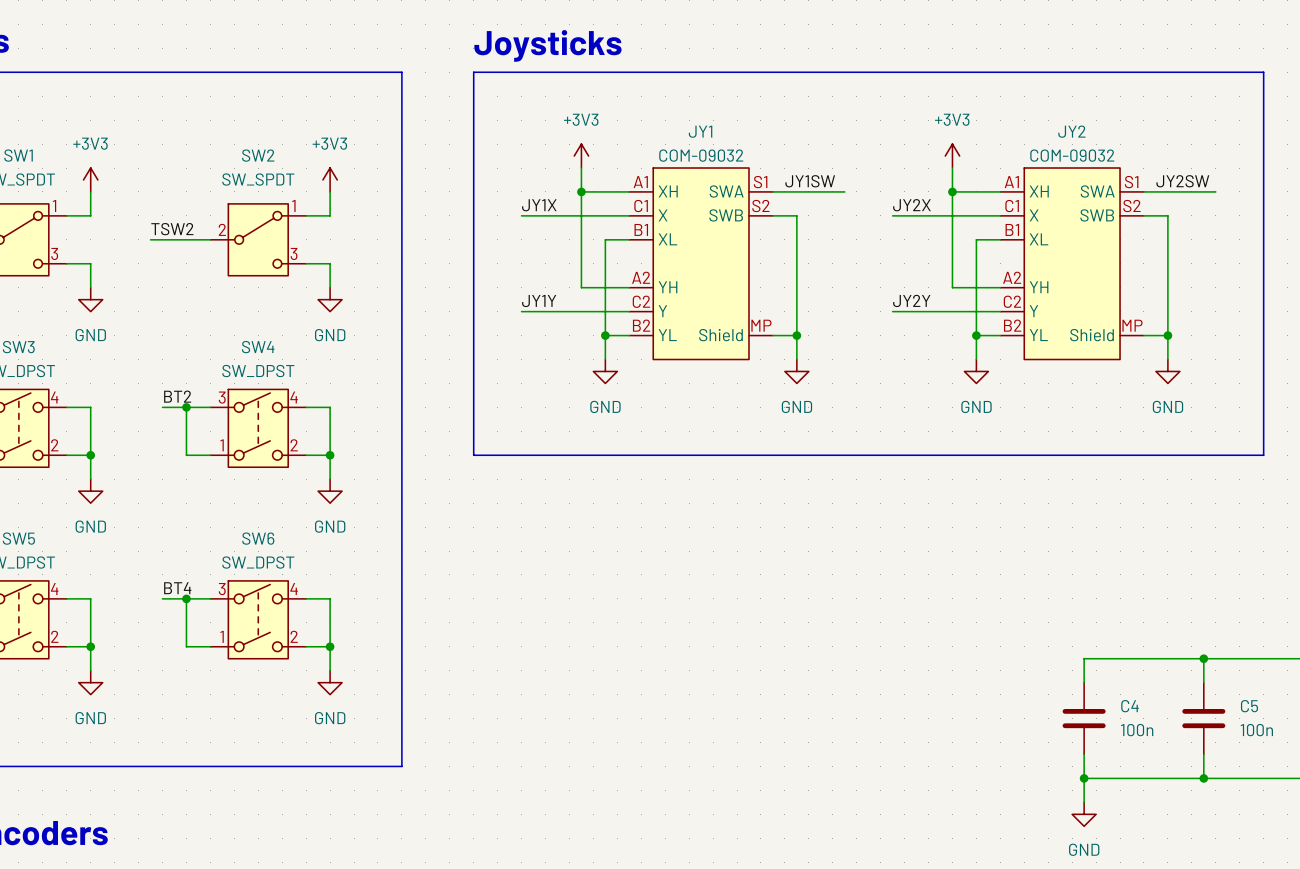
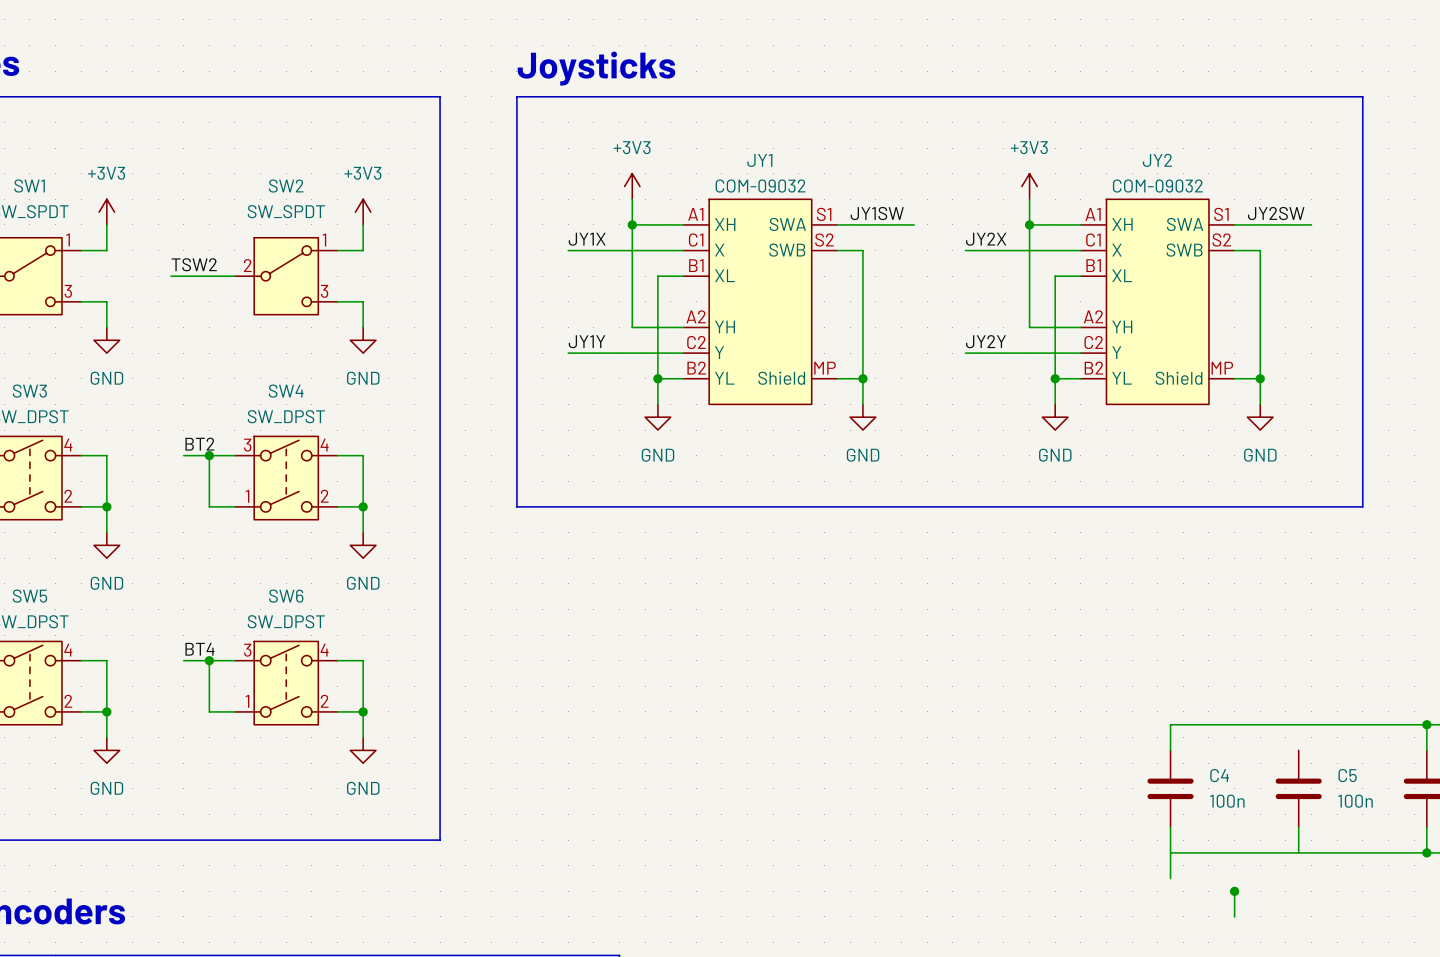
wire: (1203, 658) (1203, 682) -> (1234, 891) (1234, 916)
junction: (1203, 658) -> none
junction: (1084, 778) -> none
junction: (1203, 778) -> none
power symbol: GND (1084, 814) -> none
junction: none -> (1234, 891)

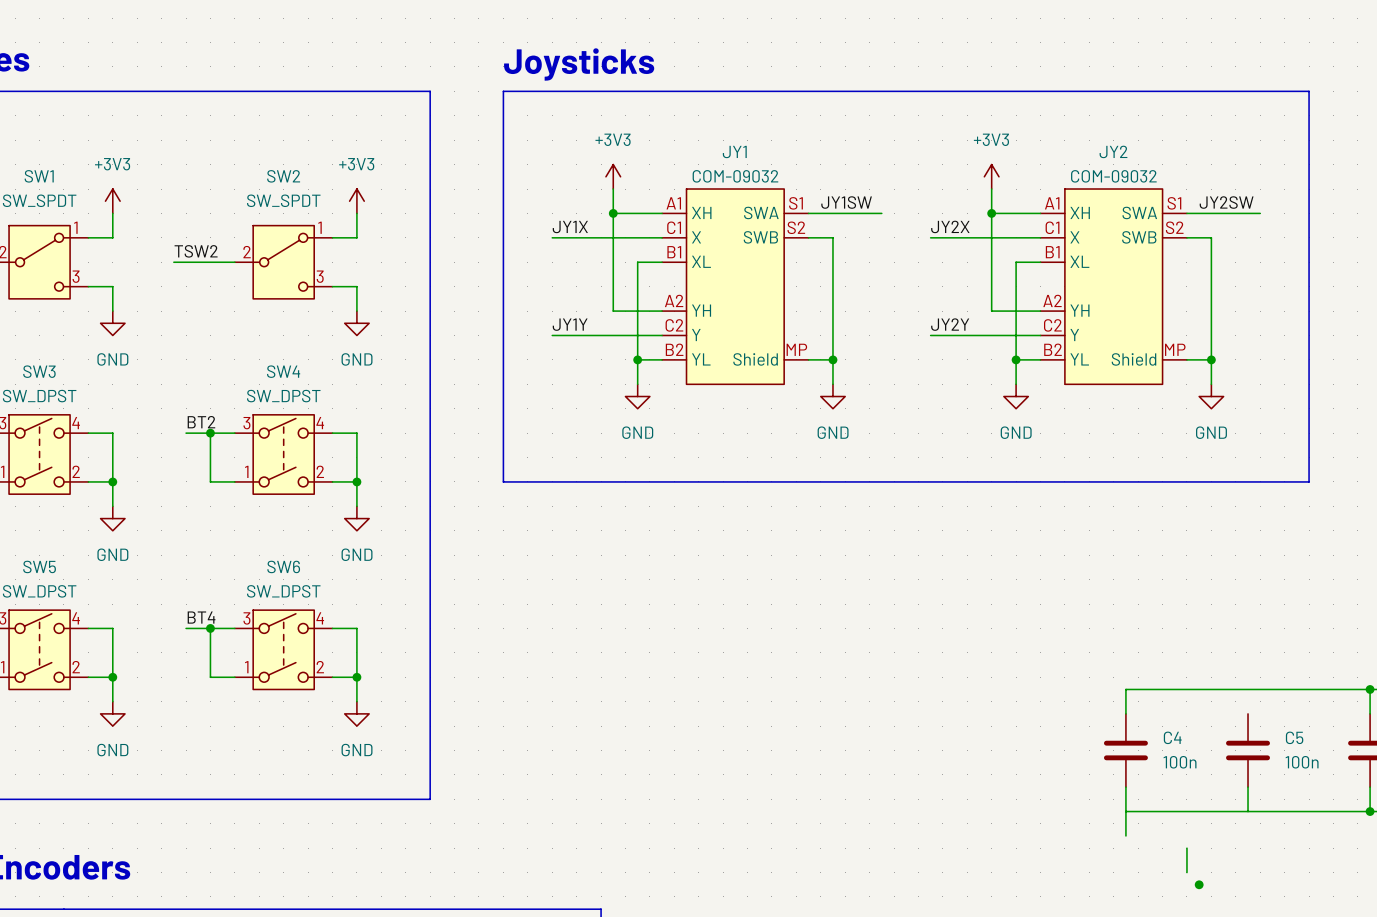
junction position: (1234, 891) -> (1199, 884)

